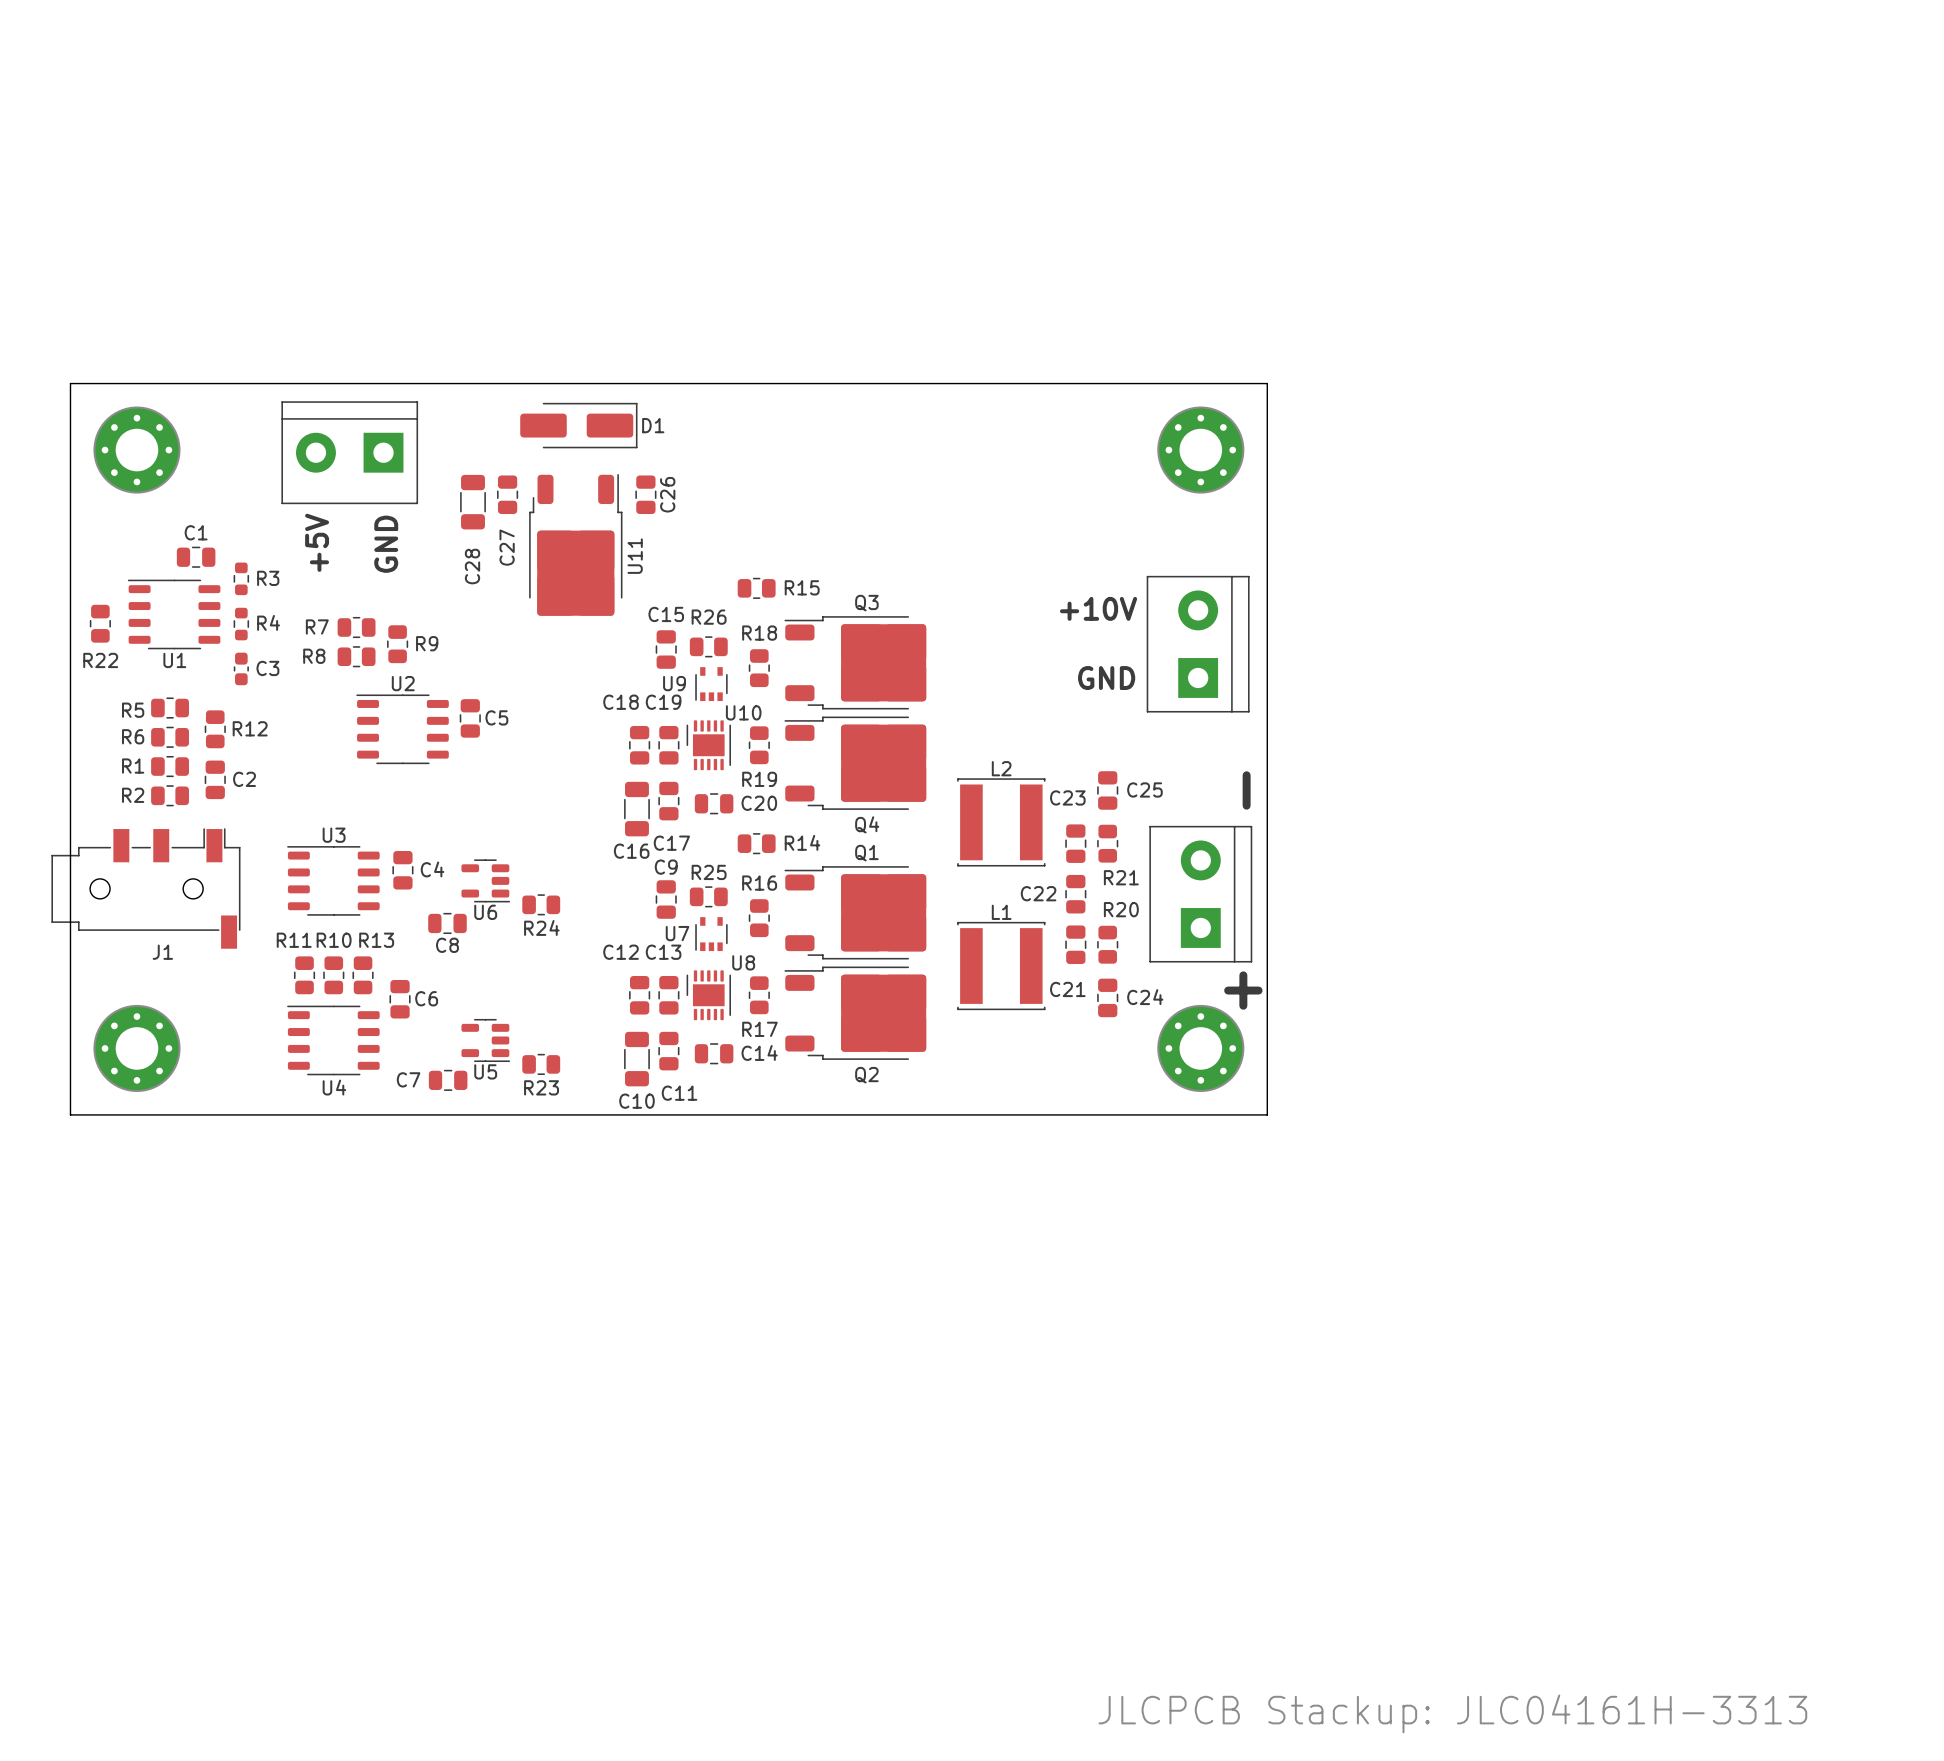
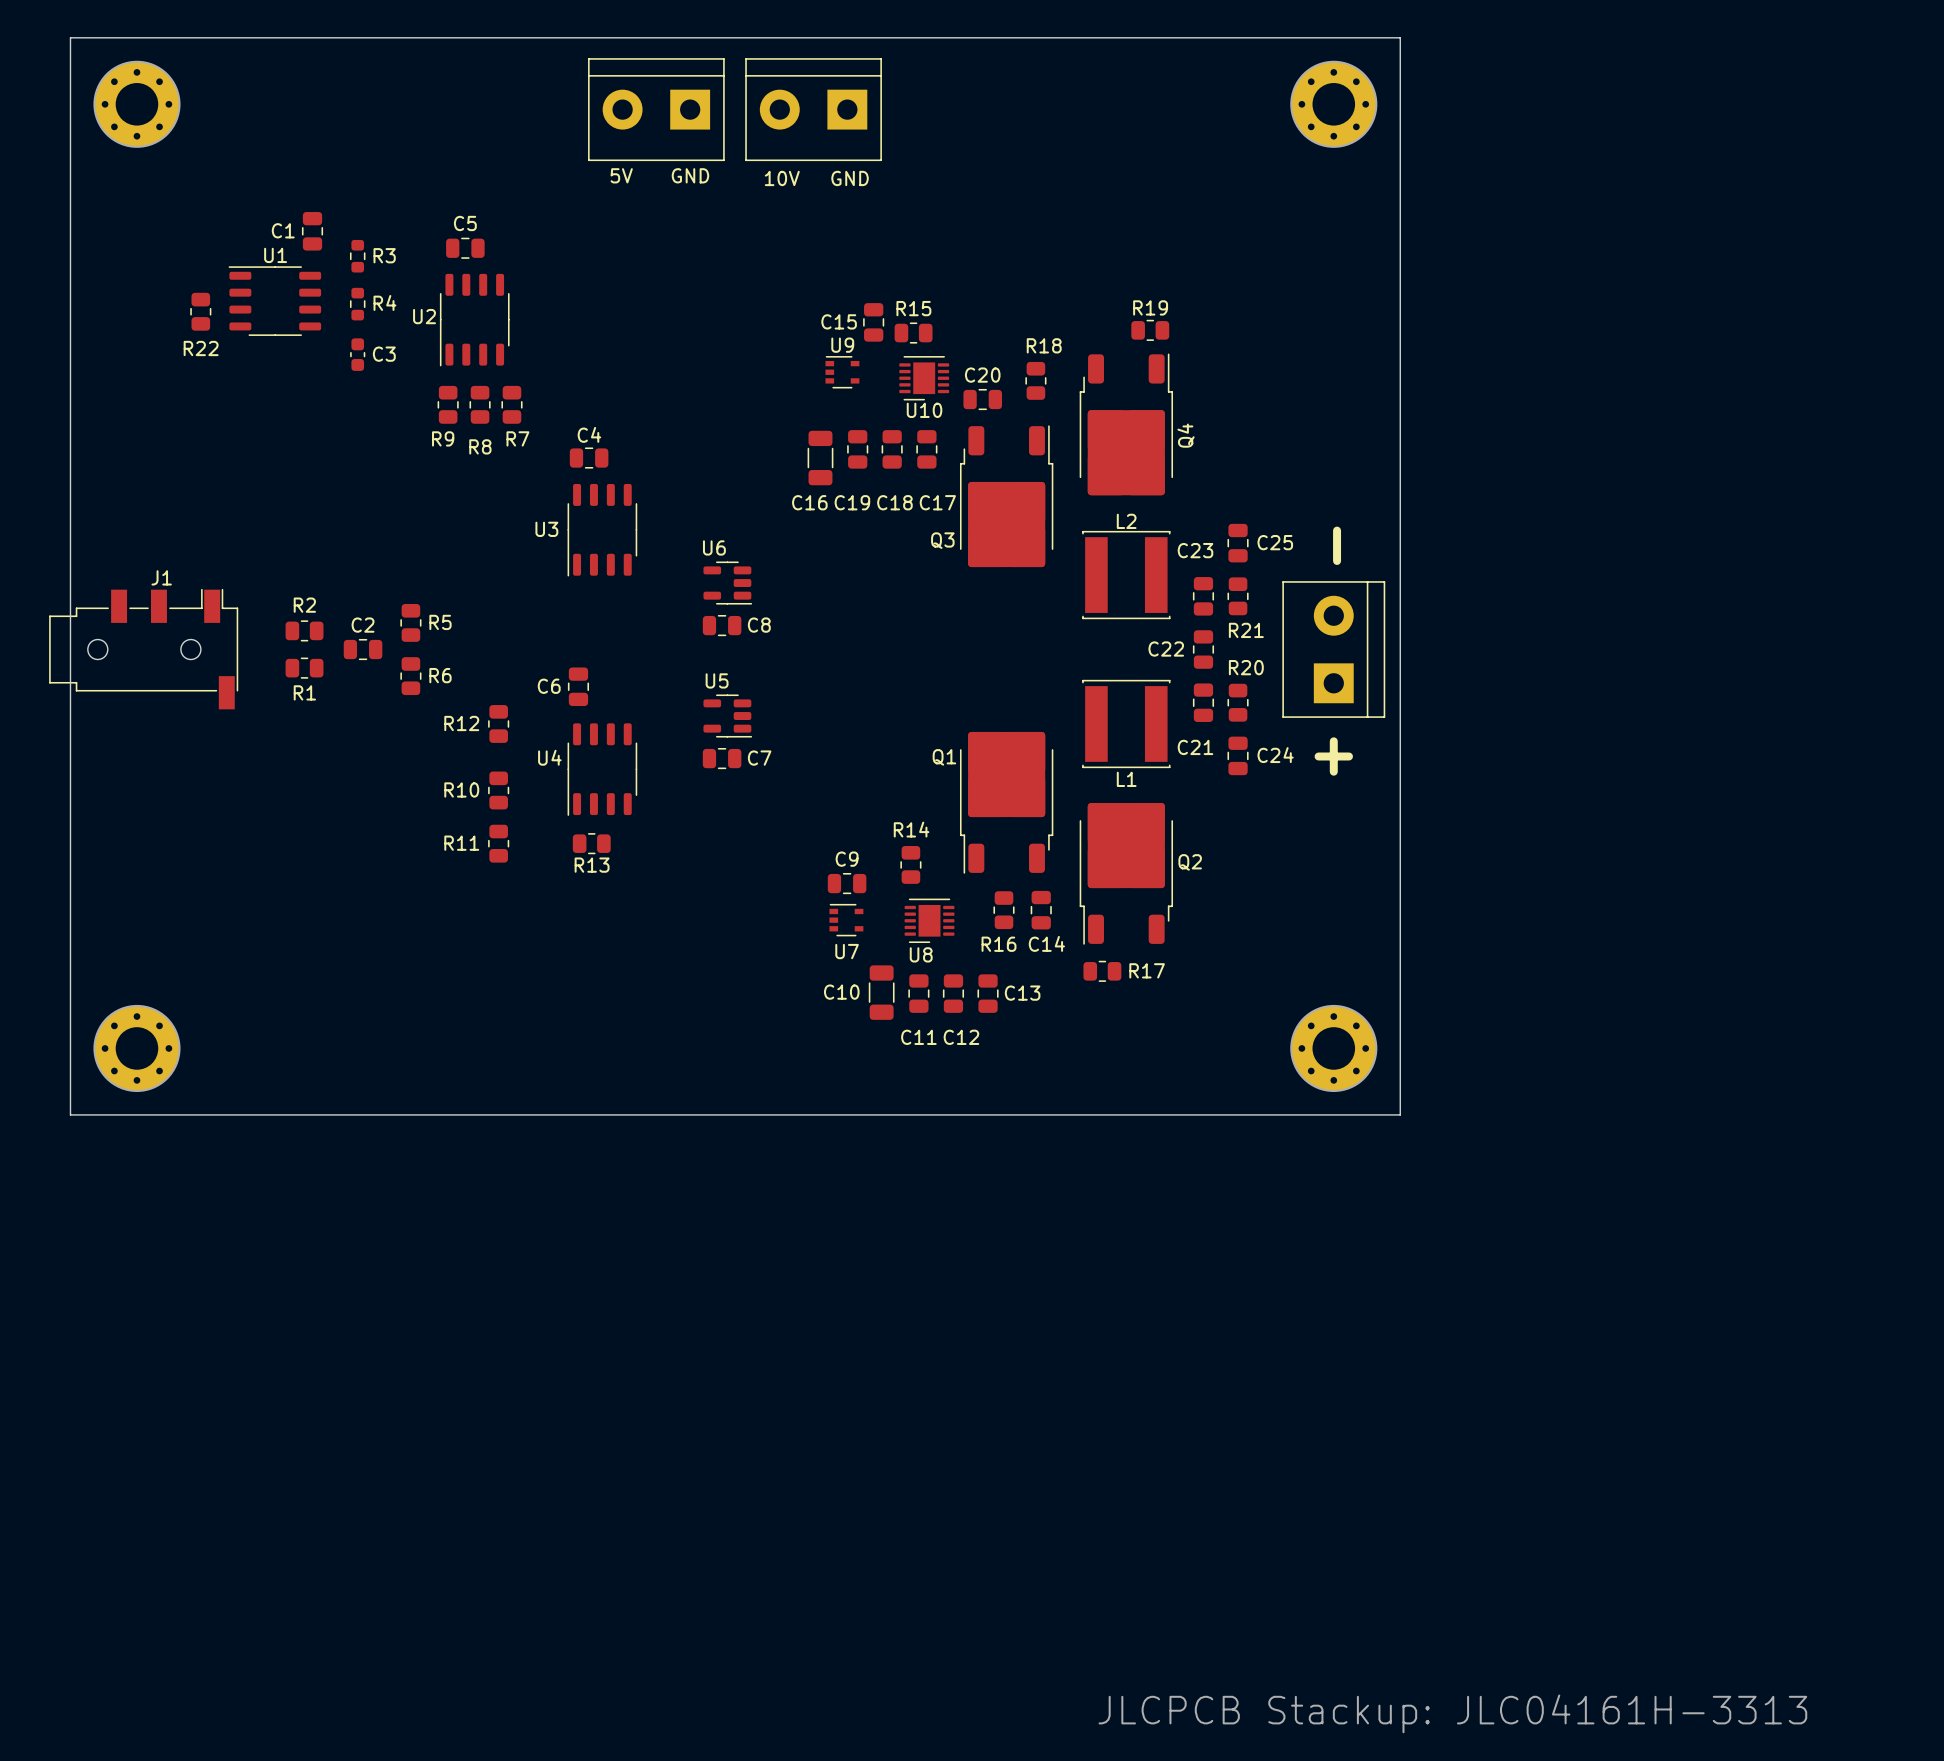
part: none -> (136, 104)
part: none -> (1333, 104)
part: none -> (656, 109)
part: none -> (813, 109)
text: none -> 5V (621, 175)
text: none -> GND (690, 175)
text: none -> 10V (782, 178)
text: none -> GND (850, 178)
board edge: (70, 383) (1267, 383) (1267, 1114) -> (70, 383) (70, 37) (1400, 37) (1400, 1114) (1267, 1114)
D1: (578, 425) -> none
part: (136, 450) -> none
part: (1200, 450) -> none
part: (349, 452) -> none
C27: (507, 494) -> none
C26: (645, 494) -> none
C28: (473, 502) -> none
C1 name position: C1 (196, 532) -> C1 (283, 230)
text: +5V (317, 542) -> none
text: GND (386, 544) -> none
U11: (575, 544) -> none
C1 rotation: 0° (196, 557) -> 90° clockwise (312, 231)
C1 position: (196, 557) -> (312, 231)
R3 position: (241, 578) -> (357, 256)
R15 name position: R15 (802, 587) -> R15 (913, 308)
R15 position: (756, 588) -> (913, 333)
Q3 name position: Q3 (866, 603) -> Q3 (942, 540)
text: +10V (1098, 608) -> none
U1 position: (174, 614) -> (274, 301)
C15 name position: C15 (666, 614) -> C15 (839, 321)
R22 position: (100, 623) -> (200, 311)
R4 position: (241, 624) -> (357, 304)
R7 name position: R7 (317, 626) -> R7 (517, 438)
R7 rotation: 0° (356, 627) -> 90° clockwise (511, 404)
R7 position: (356, 627) -> (511, 404)
R18 name position: R18 (759, 633) -> R18 (1044, 345)
R9 name position: R9 (427, 643) -> R9 (443, 438)
R9 position: (397, 644) -> (448, 404)
part position: (1198, 644) -> (1333, 649)
R26: (708, 646) -> none
C15 position: (666, 649) -> (873, 322)
R8 name position: R8 (314, 656) -> R8 (480, 446)
R8 rotation: 0° (356, 656) -> 90° clockwise (480, 404)
R8 position: (356, 656) -> (480, 404)
U1 name position: U1 (174, 660) -> U1 (275, 255)
Q3 rotation: 0° (855, 662) -> 90° clockwise (1006, 496)
Q3 position: (855, 662) -> (1006, 496)
C3 position: (241, 668) -> (357, 354)
R18 position: (759, 668) -> (1035, 380)
text: GND (1106, 678) -> none
U9 rotation: 0° (711, 684) -> 90° clockwise (842, 372)
U9 position: (711, 684) -> (842, 372)
C18 name position: C18 (621, 702) -> C18 (894, 502)
C19 name position: C19 (663, 702) -> C19 (852, 502)
R5 rotation: 0° (170, 708) -> 90° clockwise (410, 622)
R5 position: (170, 708) -> (410, 622)
R5 name position: R5 (133, 710) -> R5 (440, 622)
U10 name position: U10 (743, 712) -> U10 (924, 410)
C5 name position: C5 (496, 717) -> C5 (465, 223)
C5 rotation: 0° (470, 718) -> 90° clockwise (465, 248)
C5 position: (470, 718) -> (465, 248)
R12 name position: R12 (250, 728) -> R12 (461, 723)
R12 position: (215, 729) -> (498, 723)
U2 rotation: 0° (402, 729) -> 90° counterclockwise (474, 320)
U2 position: (402, 729) -> (474, 320)
R6 name position: R6 (133, 736) -> R6 (440, 675)
R6 rotation: 0° (170, 737) -> 90° clockwise (410, 676)
R6 position: (170, 737) -> (410, 676)
C18 position: (639, 745) -> (892, 449)
C19 position: (668, 745) -> (857, 449)
U10 rotation: 0° (708, 745) -> 90° counterclockwise (924, 378)
U10 position: (708, 745) -> (924, 378)
R19 rotation: 0° (759, 745) -> 90° clockwise (1150, 330)
R19 position: (759, 745) -> (1150, 330)
Q4 rotation: 0° (855, 763) -> 90° clockwise (1126, 424)
Q4 position: (855, 763) -> (1126, 424)
R1 name position: R1 (133, 766) -> R1 (304, 692)
R1 position: (170, 766) -> (304, 668)
C2 rotation: 0° (215, 779) -> 90° clockwise (363, 649)
C2 position: (215, 779) -> (363, 649)
C2 name position: C2 (244, 779) -> C2 (363, 625)
R19 name position: R19 (759, 779) -> R19 (1150, 307)
C25 position: (1107, 790) -> (1238, 543)
text position: - (1246, 790) -> - (1337, 545)
R2 name position: R2 (133, 795) -> R2 (304, 605)
R2 position: (170, 795) -> (304, 630)
C17 position: (668, 801) -> (926, 449)
C20 position: (714, 803) -> (982, 399)
C20 name position: C20 (759, 803) -> C20 (982, 375)
C16 position: (636, 809) -> (820, 458)
L2 position: (1001, 822) -> (1126, 575)
Q4 name position: Q4 (867, 824) -> Q4 (1186, 435)
R14 name position: R14 (802, 842) -> R14 (911, 829)
C17 name position: C17 (671, 843) -> C17 (937, 502)
R14 rotation: 0° (756, 843) -> 90° clockwise (910, 864)
R14 position: (756, 843) -> (910, 864)
C23 position: (1075, 843) -> (1203, 596)
R21 position: (1107, 843) -> (1238, 596)
C16 name position: C16 (631, 851) -> C16 (809, 502)
Q1 name position: Q1 (866, 853) -> Q1 (944, 757)
C4 name position: C4 (432, 869) -> C4 (589, 434)
C4 rotation: 0° (402, 870) -> 90° clockwise (589, 458)
C4 position: (402, 870) -> (589, 458)
R21 name position: R21 (1121, 877) -> R21 (1246, 630)
U3 rotation: 0° (333, 880) -> 90° counterclockwise (602, 530)
U3 position: (333, 880) -> (602, 530)
U6 position: (485, 880) -> (727, 583)
R16 name position: R16 (759, 883) -> R16 (998, 944)
J1 position: (145, 888) -> (143, 649)
C22 position: (1075, 894) -> (1203, 649)
part: (1200, 894) -> none
R25: (708, 896) -> none
C9 rotation: 0° (666, 899) -> 90° clockwise (847, 883)
C9 position: (666, 899) -> (847, 883)
R24: (541, 904) -> none
R20 name position: R20 (1121, 909) -> R20 (1246, 667)
U6 name position: U6 (485, 912) -> U6 (714, 547)
Q1 rotation: 0° (855, 912) -> 90° counterclockwise (1006, 802)
Q1 position: (855, 912) -> (1006, 802)
L1 name position: L1 (1001, 912) -> L1 (1126, 779)
R16 position: (759, 918) -> (1004, 910)
C8 position: (447, 923) -> (722, 625)
U7 name position: U7 (677, 933) -> U7 (847, 951)
U7 rotation: 0° (711, 934) -> 90° clockwise (846, 920)
U7 position: (711, 934) -> (846, 920)
R11 name position: R11 (294, 940) -> R11 (461, 843)
R10 name position: R10 (334, 940) -> R10 (461, 789)
R13 name position: R13 (376, 940) -> R13 (592, 865)
C21 position: (1075, 944) -> (1203, 702)
R20 position: (1107, 944) -> (1238, 702)
C8 name position: C8 (447, 945) -> C8 (759, 625)
J1 name position: J1 (162, 952) -> J1 (161, 577)
C12 name position: C12 (621, 952) -> C12 (961, 1037)
C13 name position: C13 (663, 952) -> C13 (1022, 993)
U8 name position: U8 (743, 962) -> U8 (921, 954)
L1 position: (1001, 966) -> (1126, 723)
R11 position: (304, 975) -> (498, 843)
R10 position: (333, 975) -> (498, 790)
R13 rotation: 0° (363, 975) -> 90° clockwise (591, 843)
R13 position: (363, 975) -> (591, 843)
text position: + (1243, 990) -> + (1333, 756)
C12 position: (639, 995) -> (953, 993)
C13 position: (668, 995) -> (988, 993)
U8 rotation: 0° (708, 995) -> 90° counterclockwise (929, 920)
U8 position: (708, 995) -> (929, 920)
R17 rotation: 0° (759, 995) -> 90° clockwise (1102, 971)
R17 position: (759, 995) -> (1102, 971)
C24 position: (1107, 997) -> (1238, 755)
C6 name position: C6 (426, 998) -> C6 (549, 686)
C6 position: (400, 999) -> (578, 686)
Q2 rotation: 0° (855, 1013) -> 90° counterclockwise (1126, 873)
Q2 position: (855, 1013) -> (1126, 873)
R17 name position: R17 (759, 1029) -> R17 (1147, 970)
U4 rotation: 0° (333, 1040) -> 90° counterclockwise (602, 769)
U4 position: (333, 1040) -> (602, 769)
U5 position: (485, 1040) -> (727, 716)
part position: (1200, 1048) -> (1333, 1048)
C11 position: (668, 1051) -> (918, 993)
C14 rotation: 0° (714, 1053) -> 90° clockwise (1041, 910)
C14 position: (714, 1053) -> (1041, 910)
C10 position: (636, 1059) -> (881, 992)
R23: (541, 1064) -> none
U5 name position: U5 (485, 1071) -> U5 (717, 680)
C7 name position: C7 (408, 1079) -> C7 (759, 758)
C7 position: (448, 1080) -> (722, 758)
U4 name position: U4 (334, 1087) -> U4 (549, 757)
C11 name position: C11 (679, 1093) -> C11 (918, 1037)
C10 name position: C10 (636, 1101) -> C10 (841, 992)

